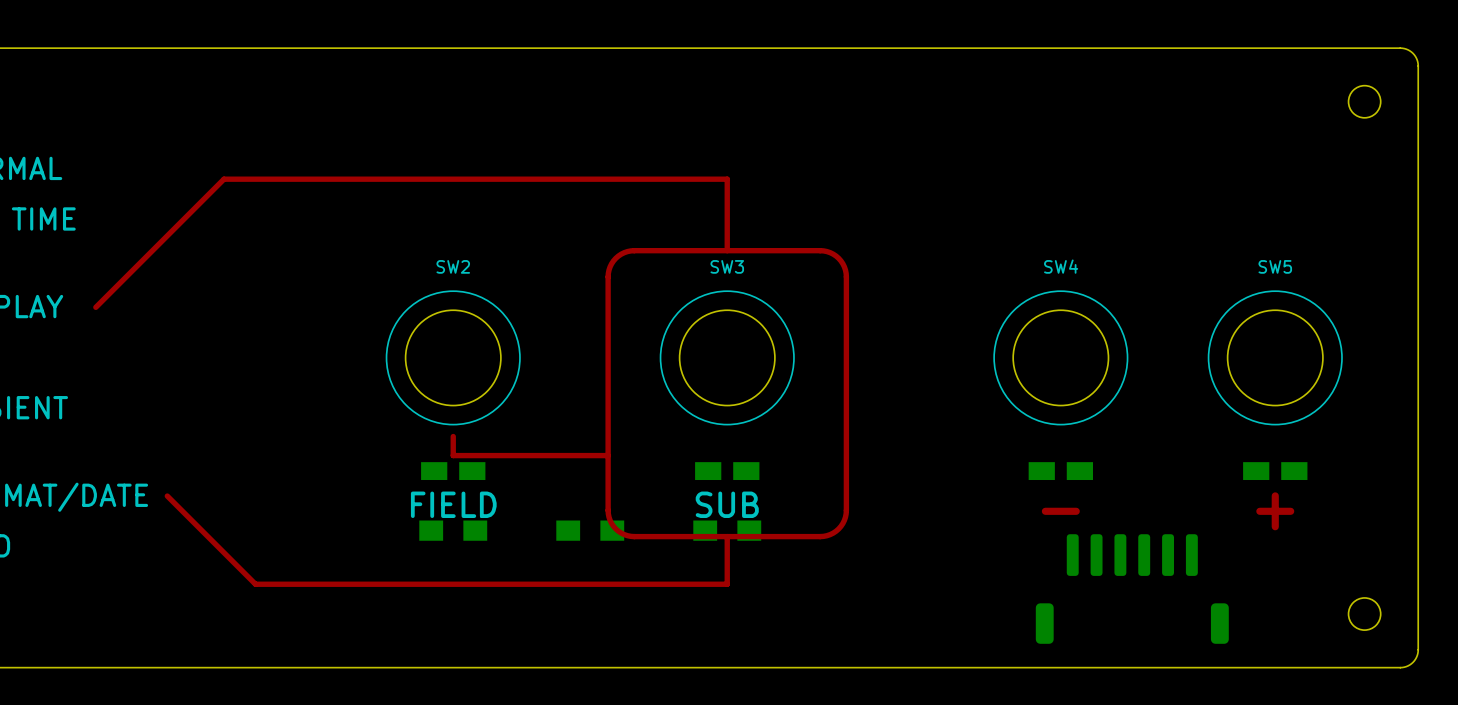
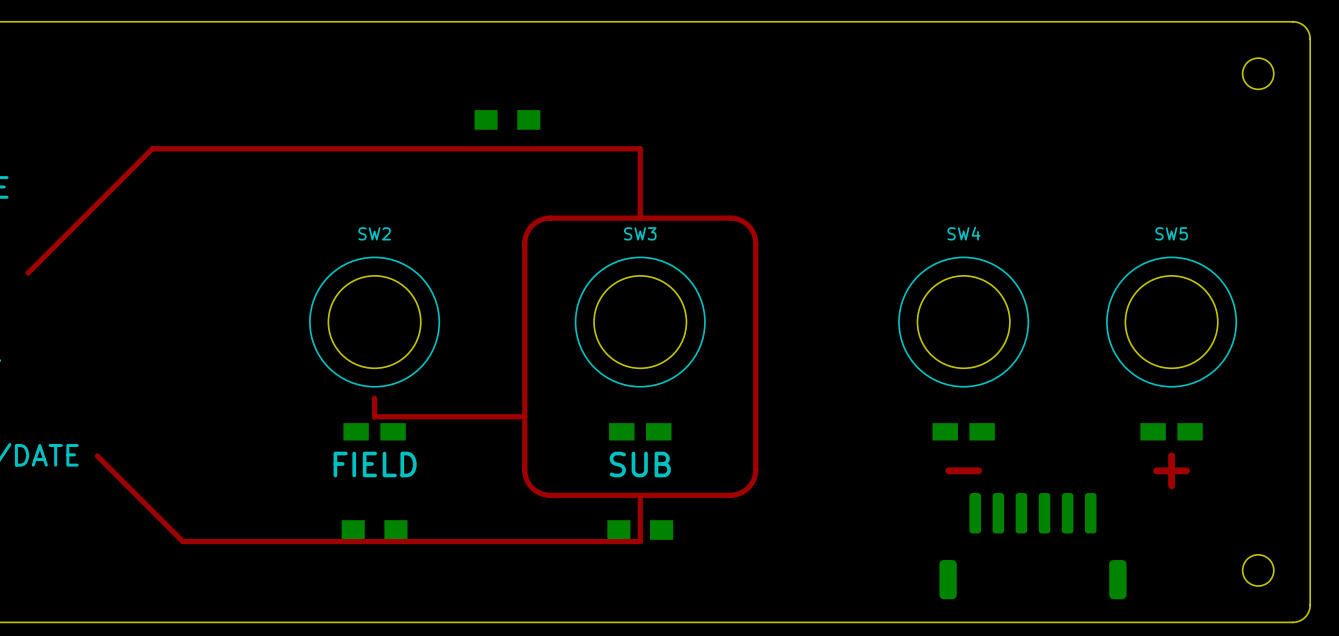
part: none -> (507, 119)
part position: (453, 530) -> (374, 529)
part: (590, 530) -> none
part position: (727, 530) -> (640, 529)

